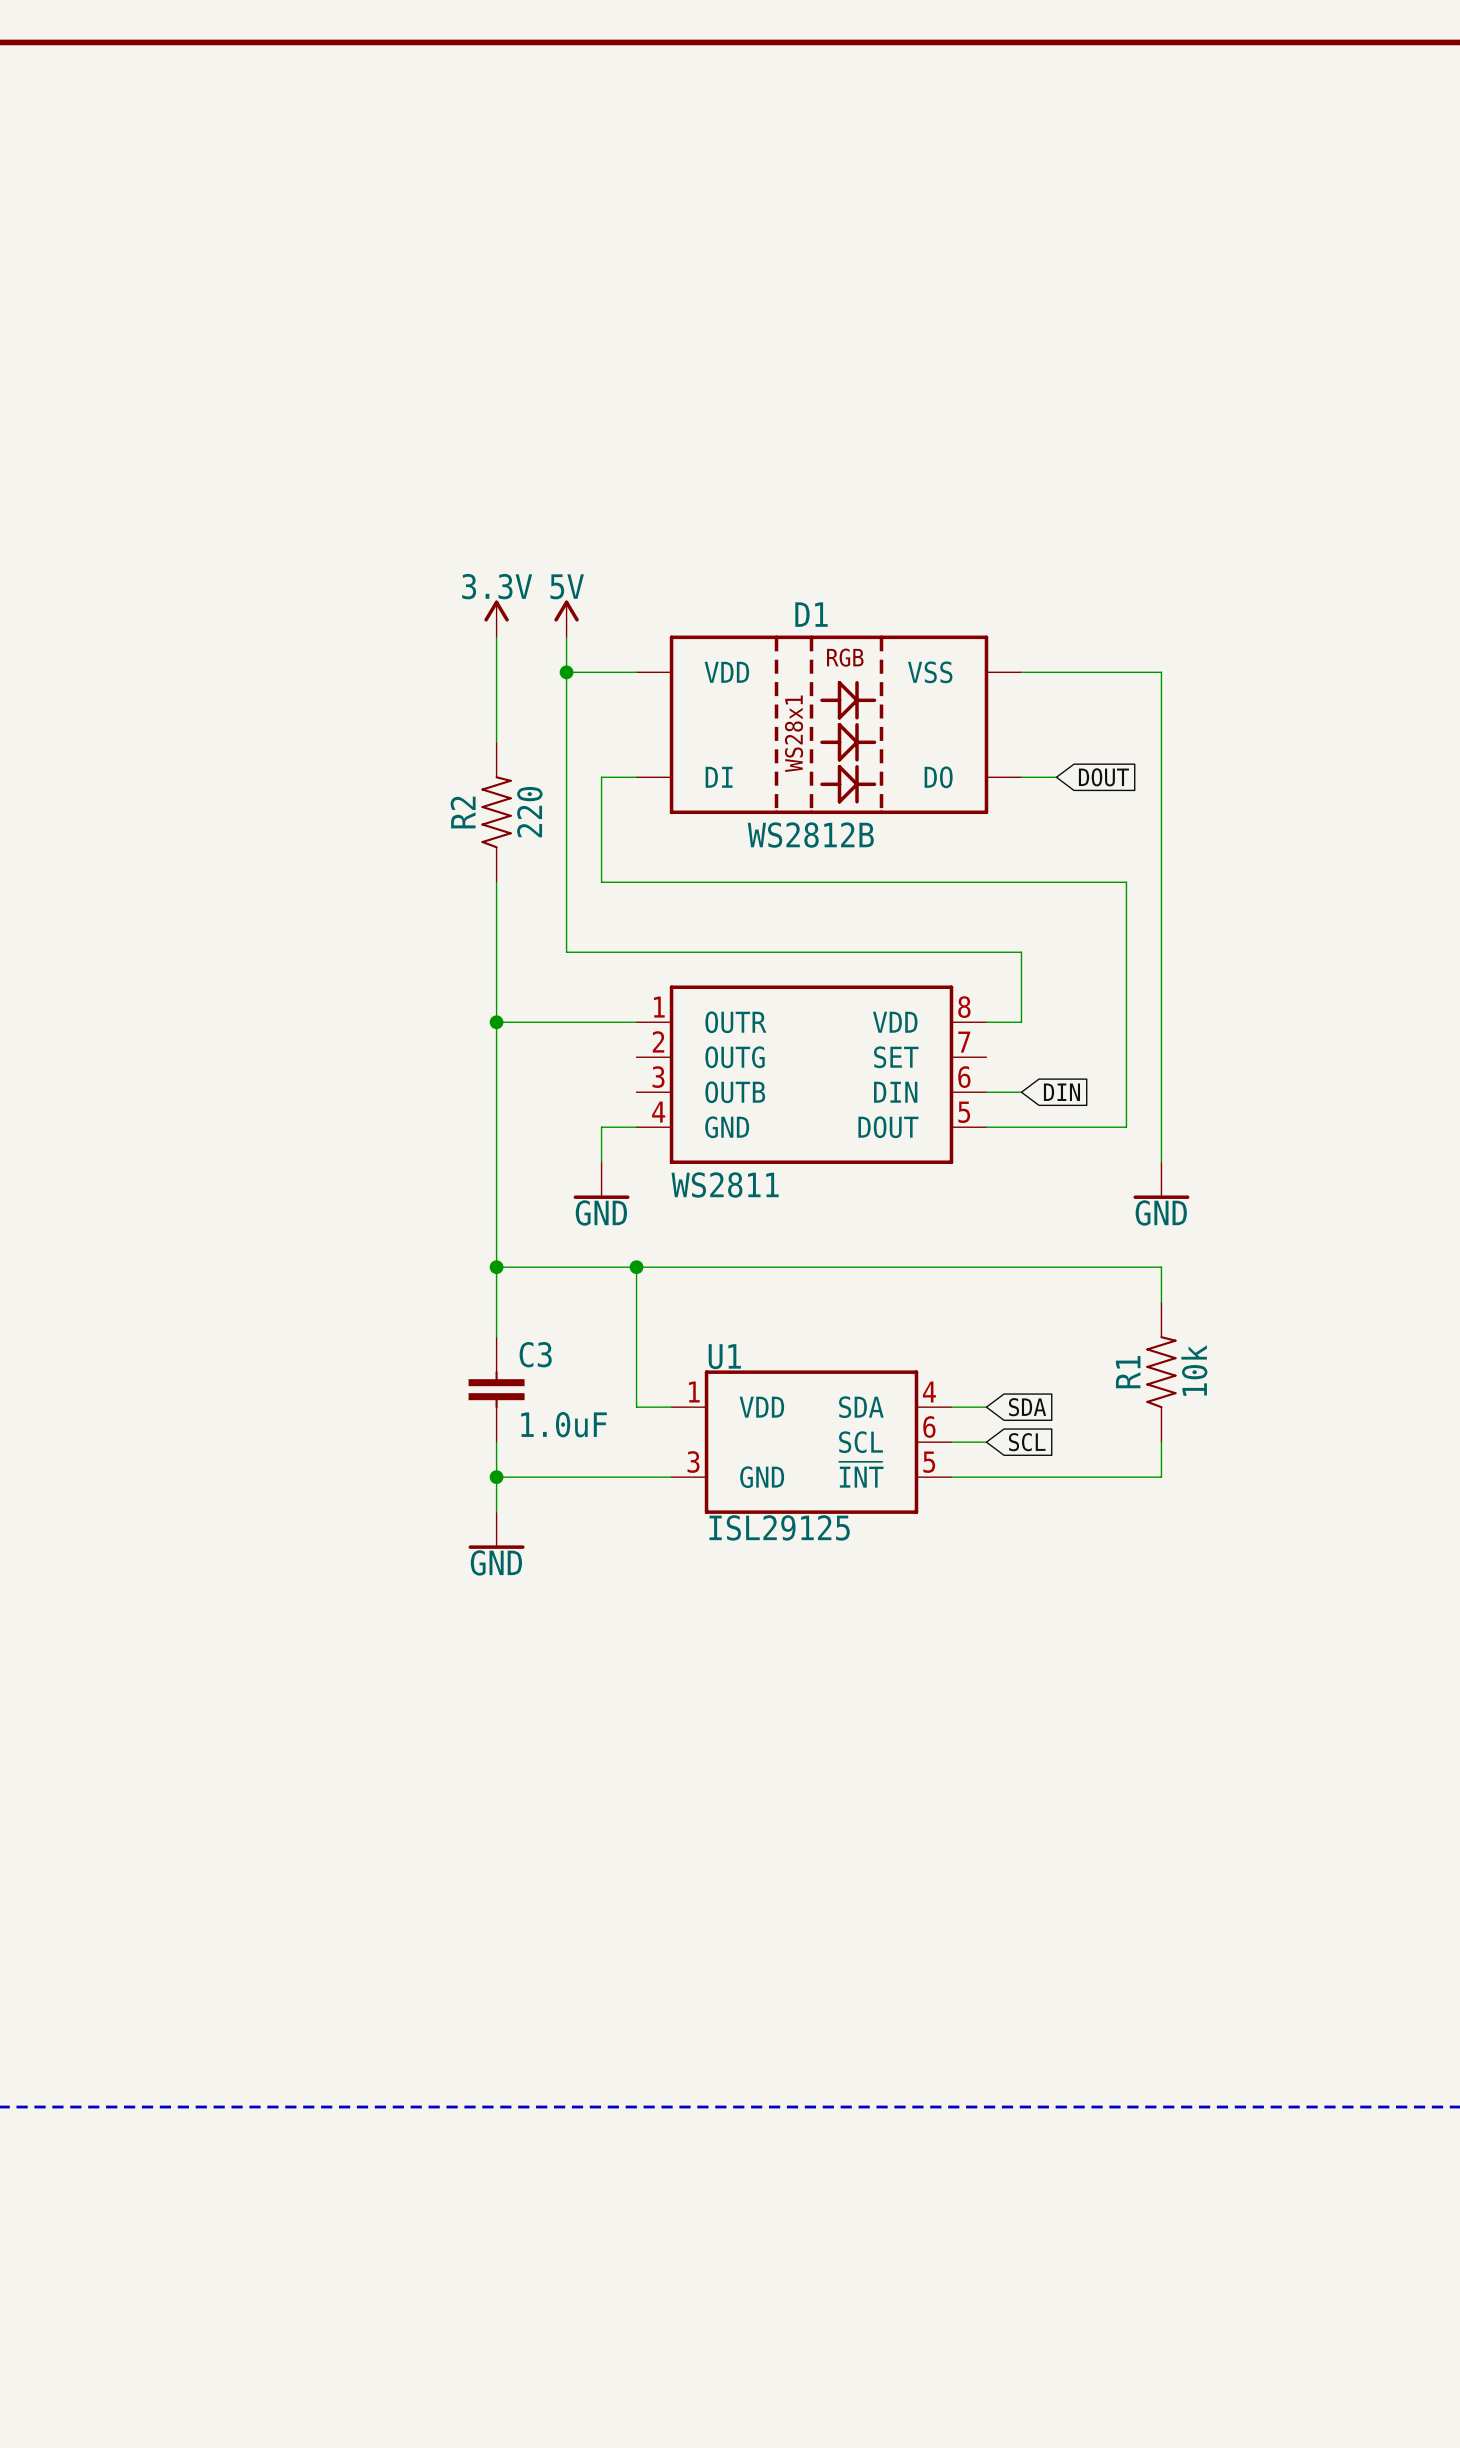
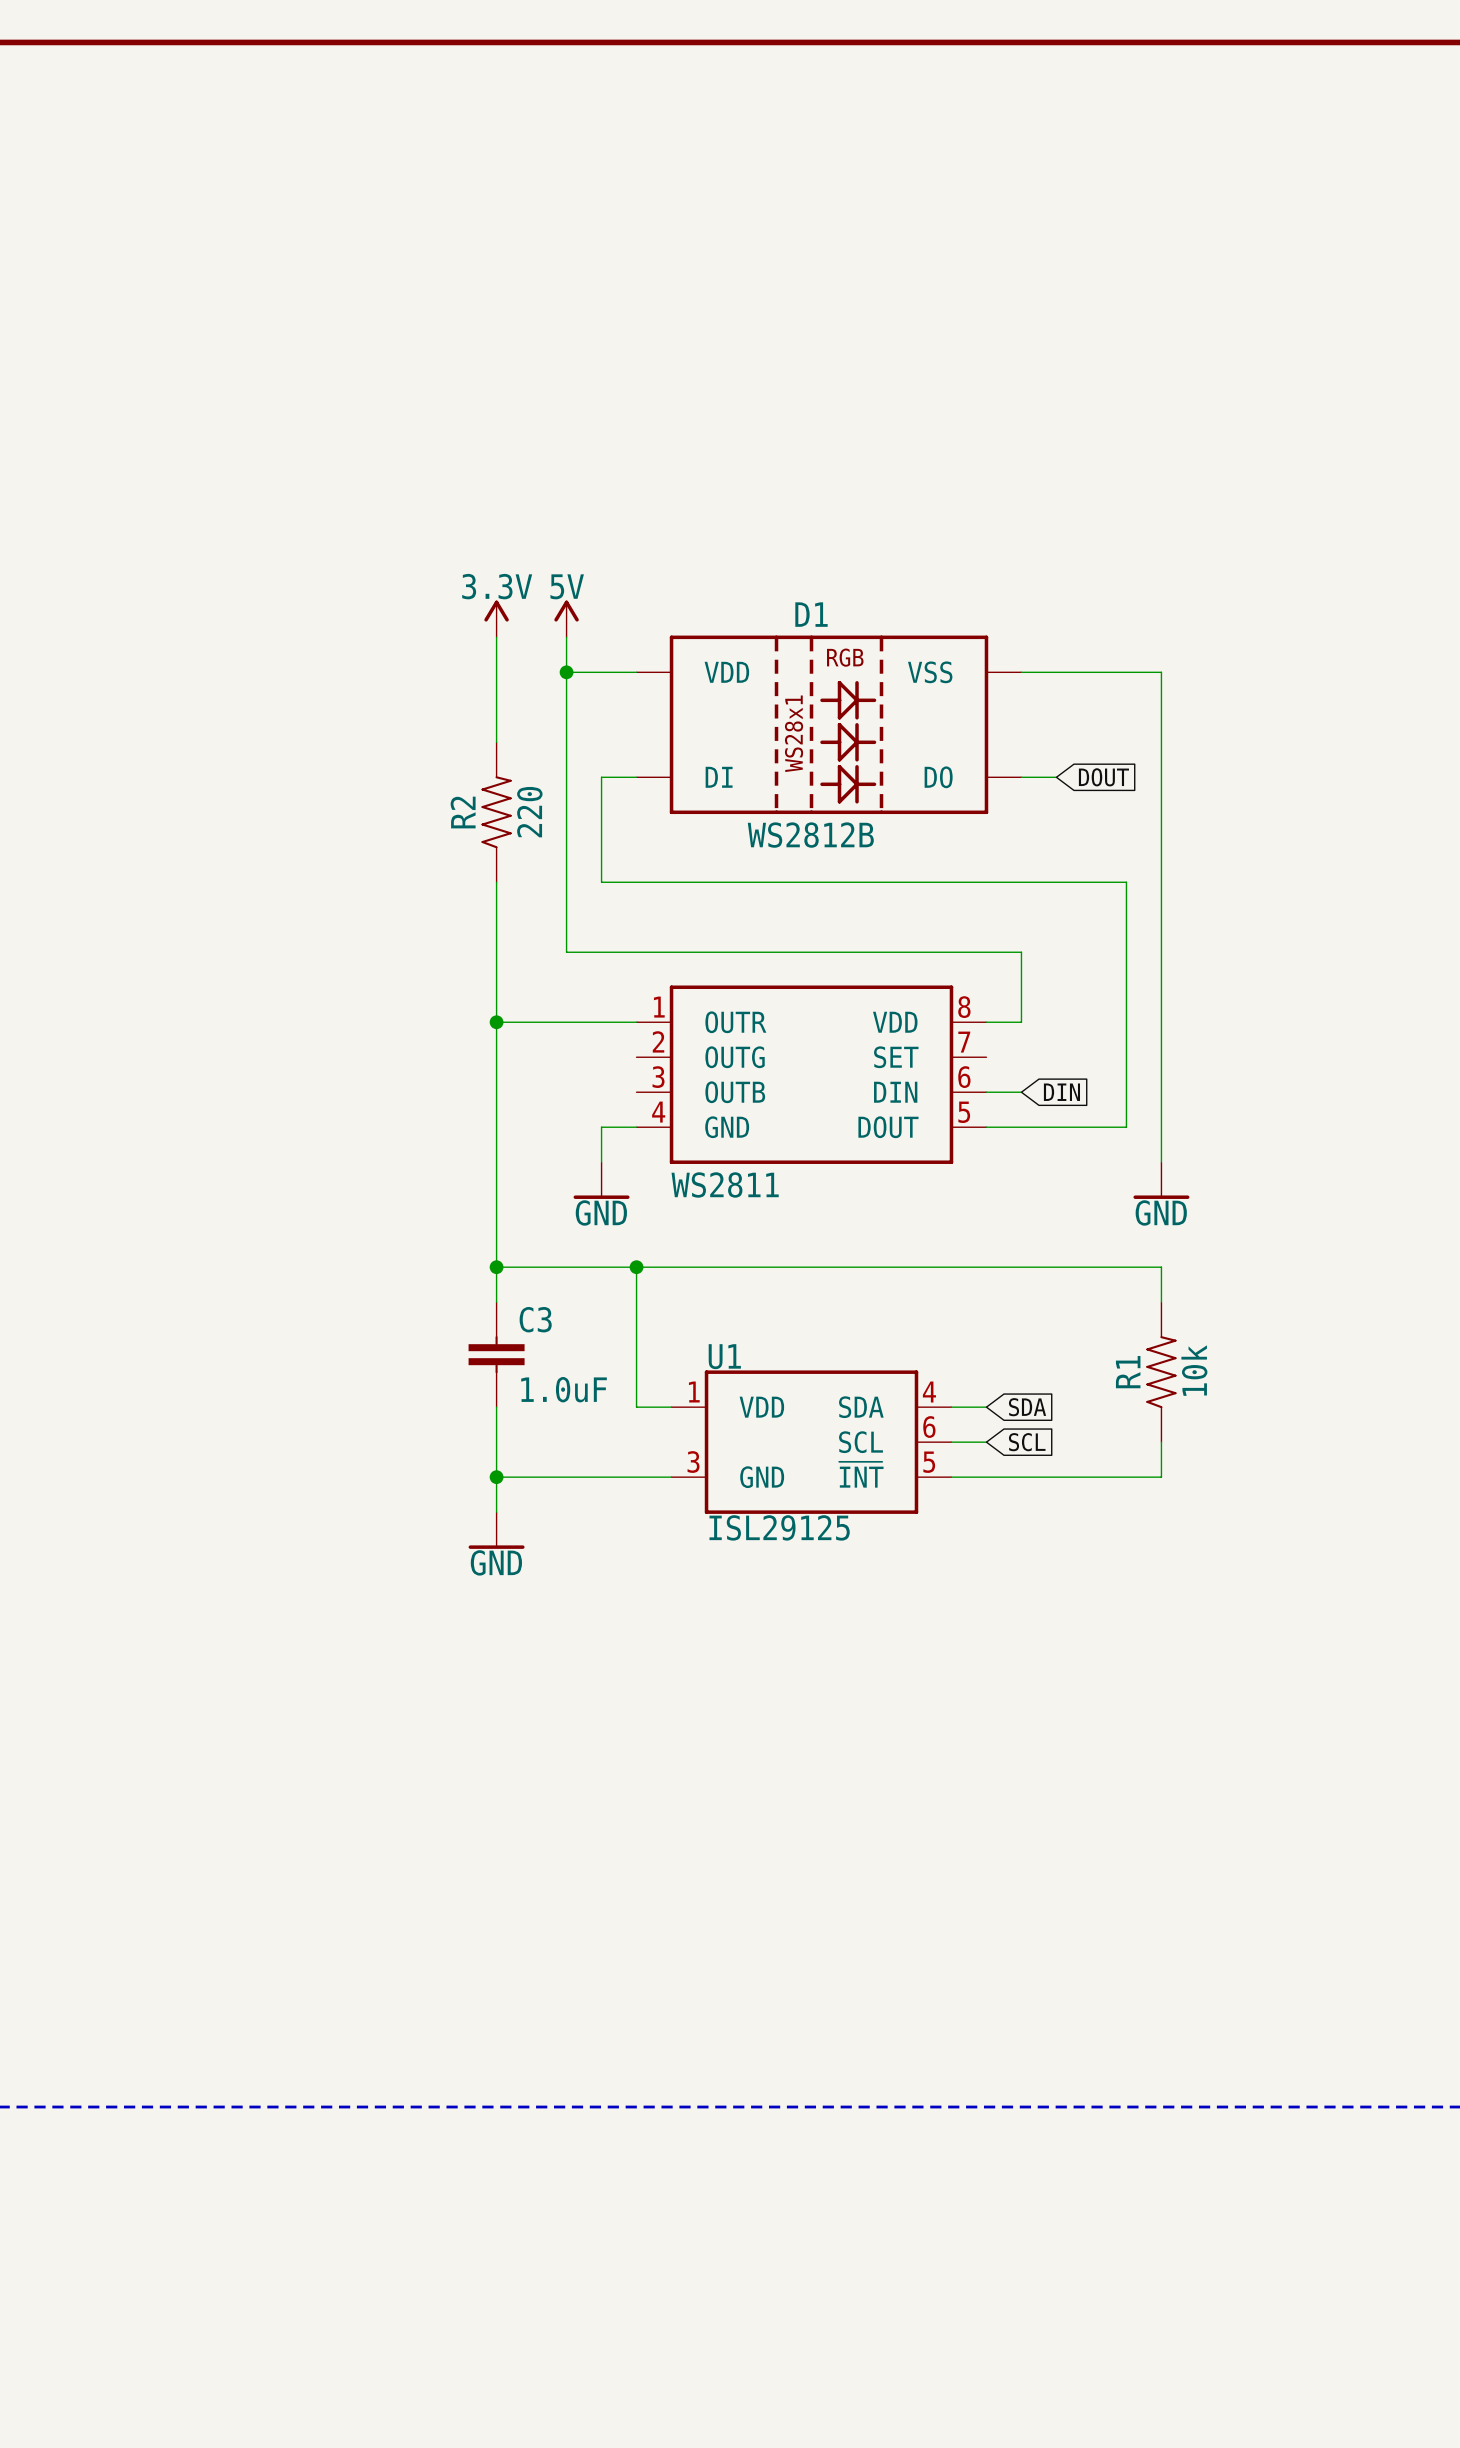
C3 position: (496, 1389) -> (496, 1354)

